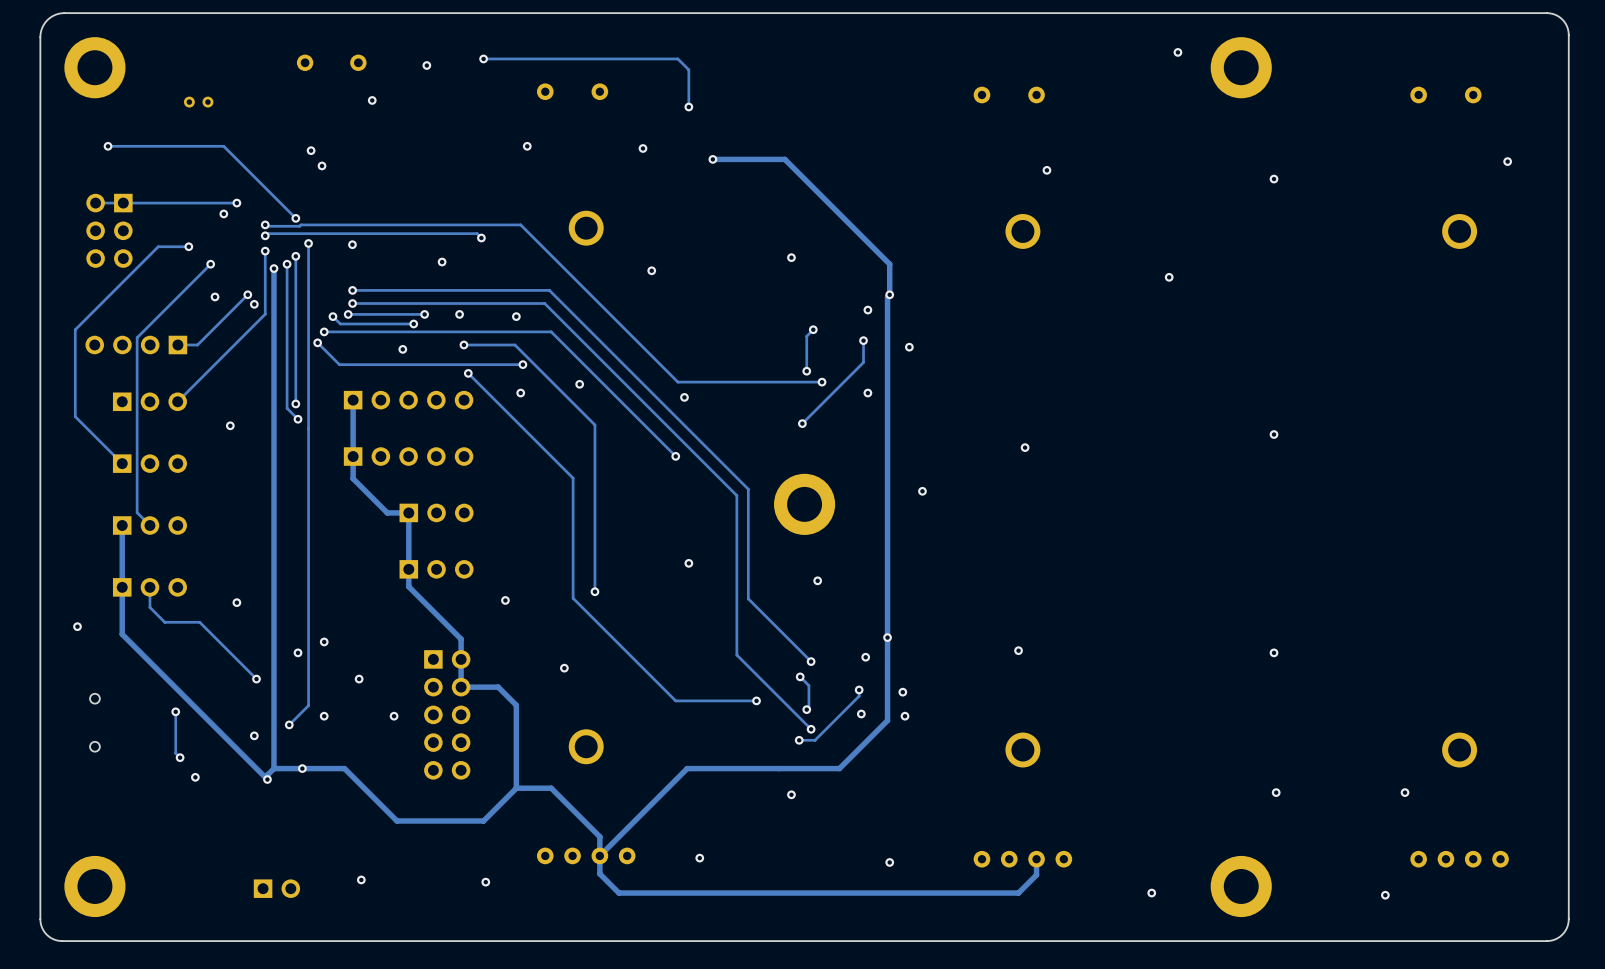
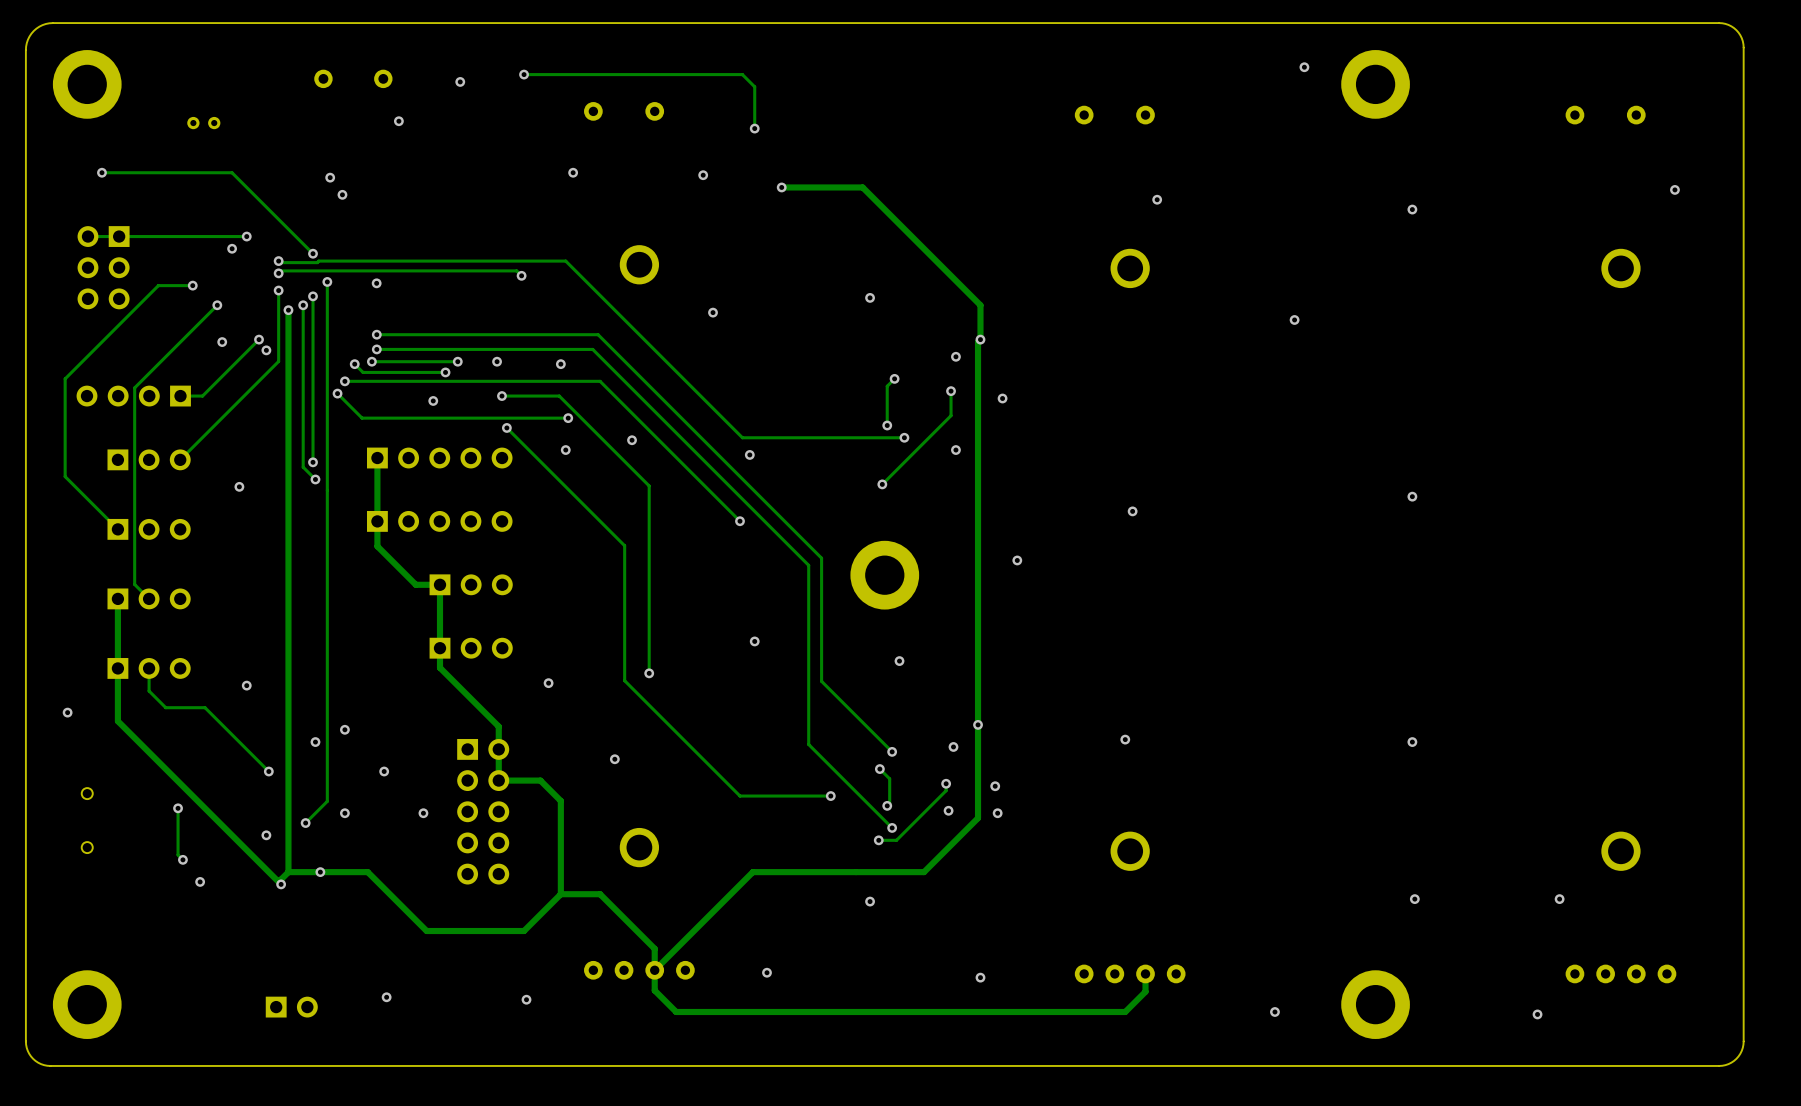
via: (442, 262) -> none

